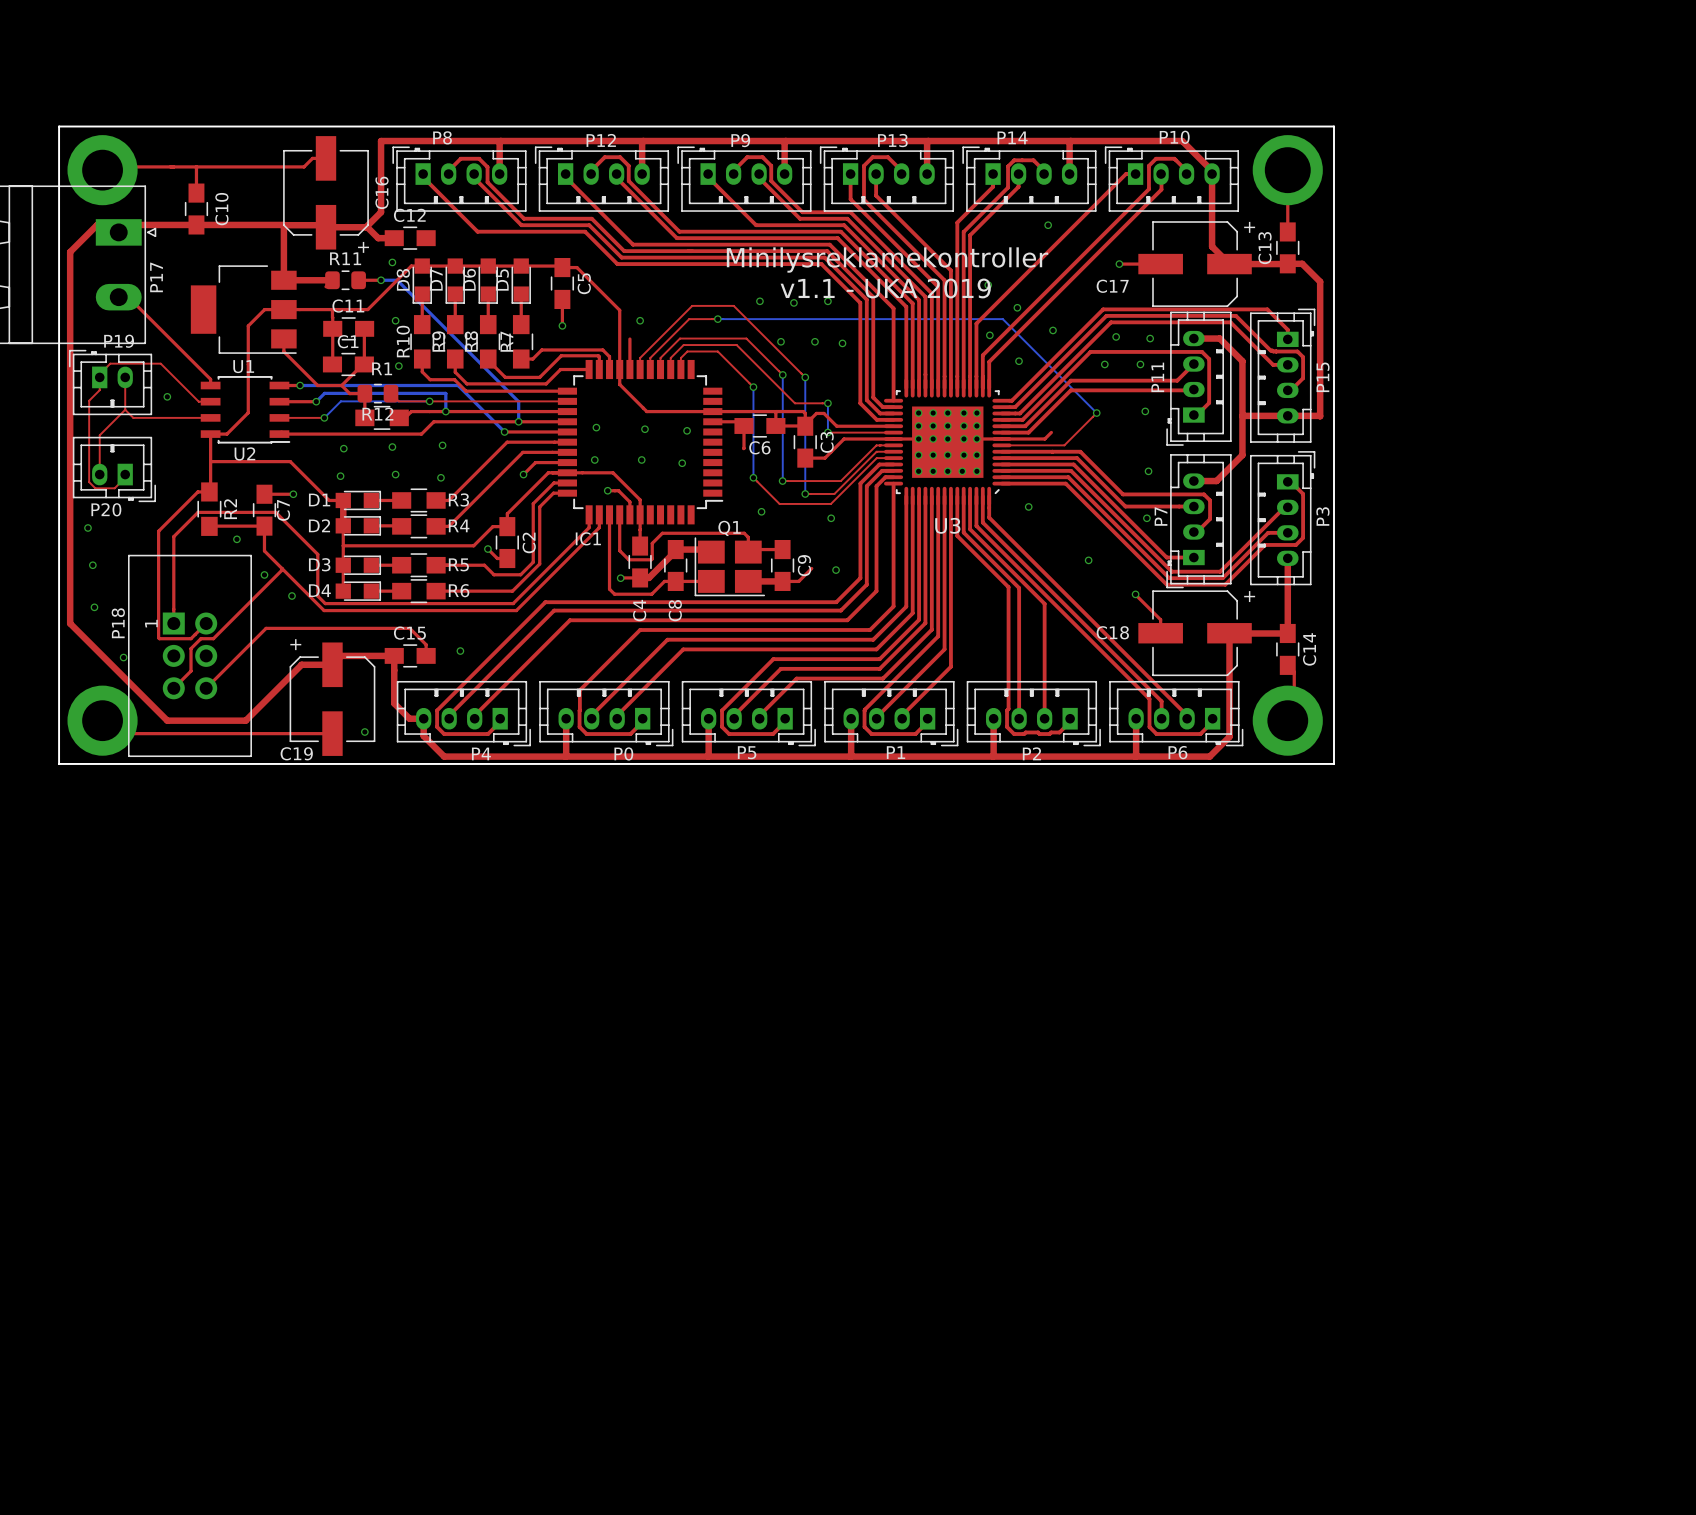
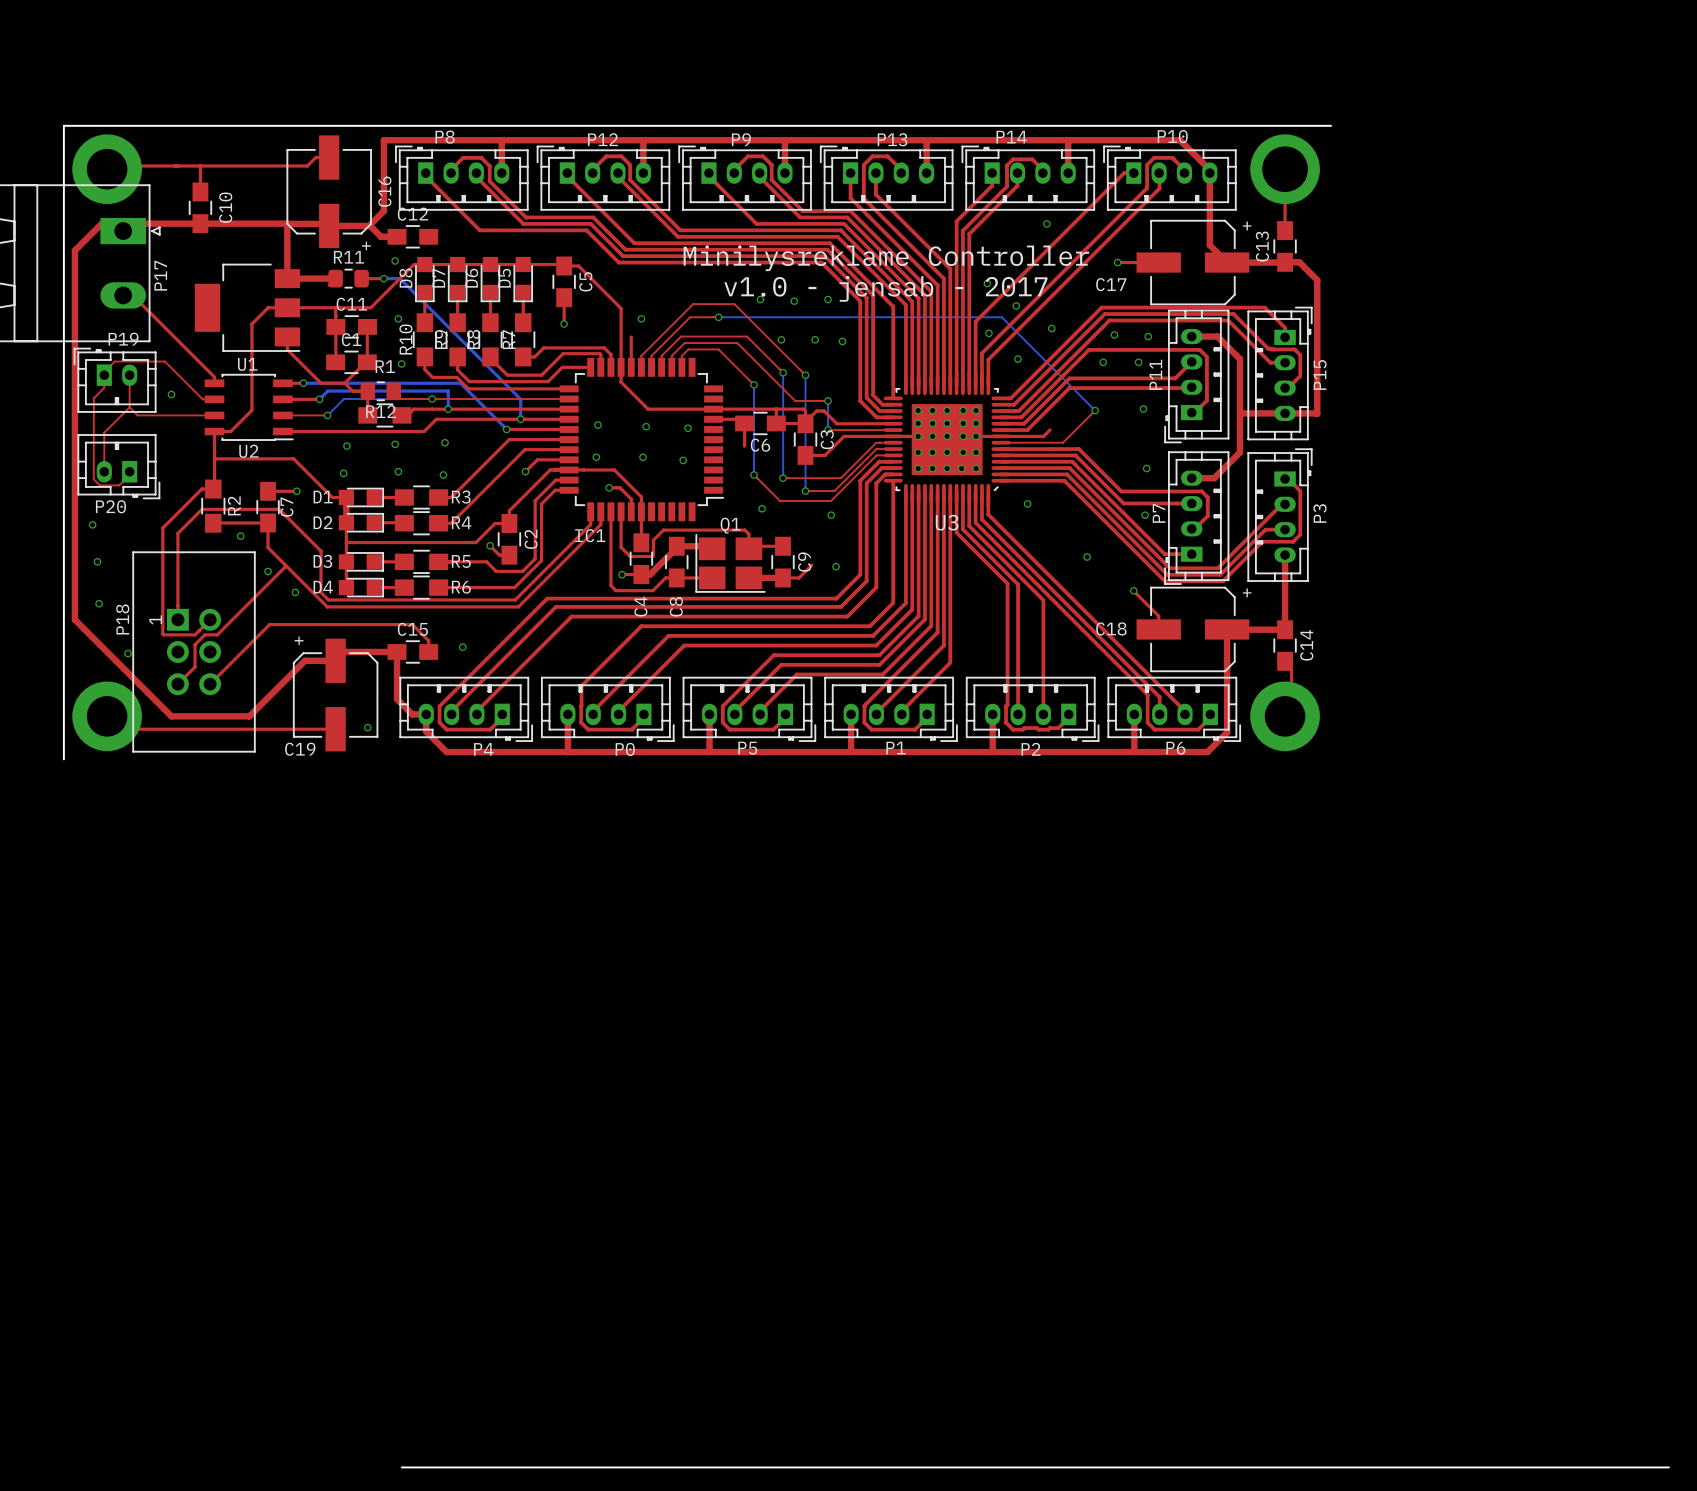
board edge: (1334, 126) (1334, 763) (59, 763) -> none
text: Minilysreklamekontroller (887, 260) -> Minilysreklame Controller (886, 258)
text: v1.1 - UKA 2019 (885, 288) -> v1.0 - jensab - 2017 (885, 288)
board edge: none -> (401, 1467) (1668, 1467)

